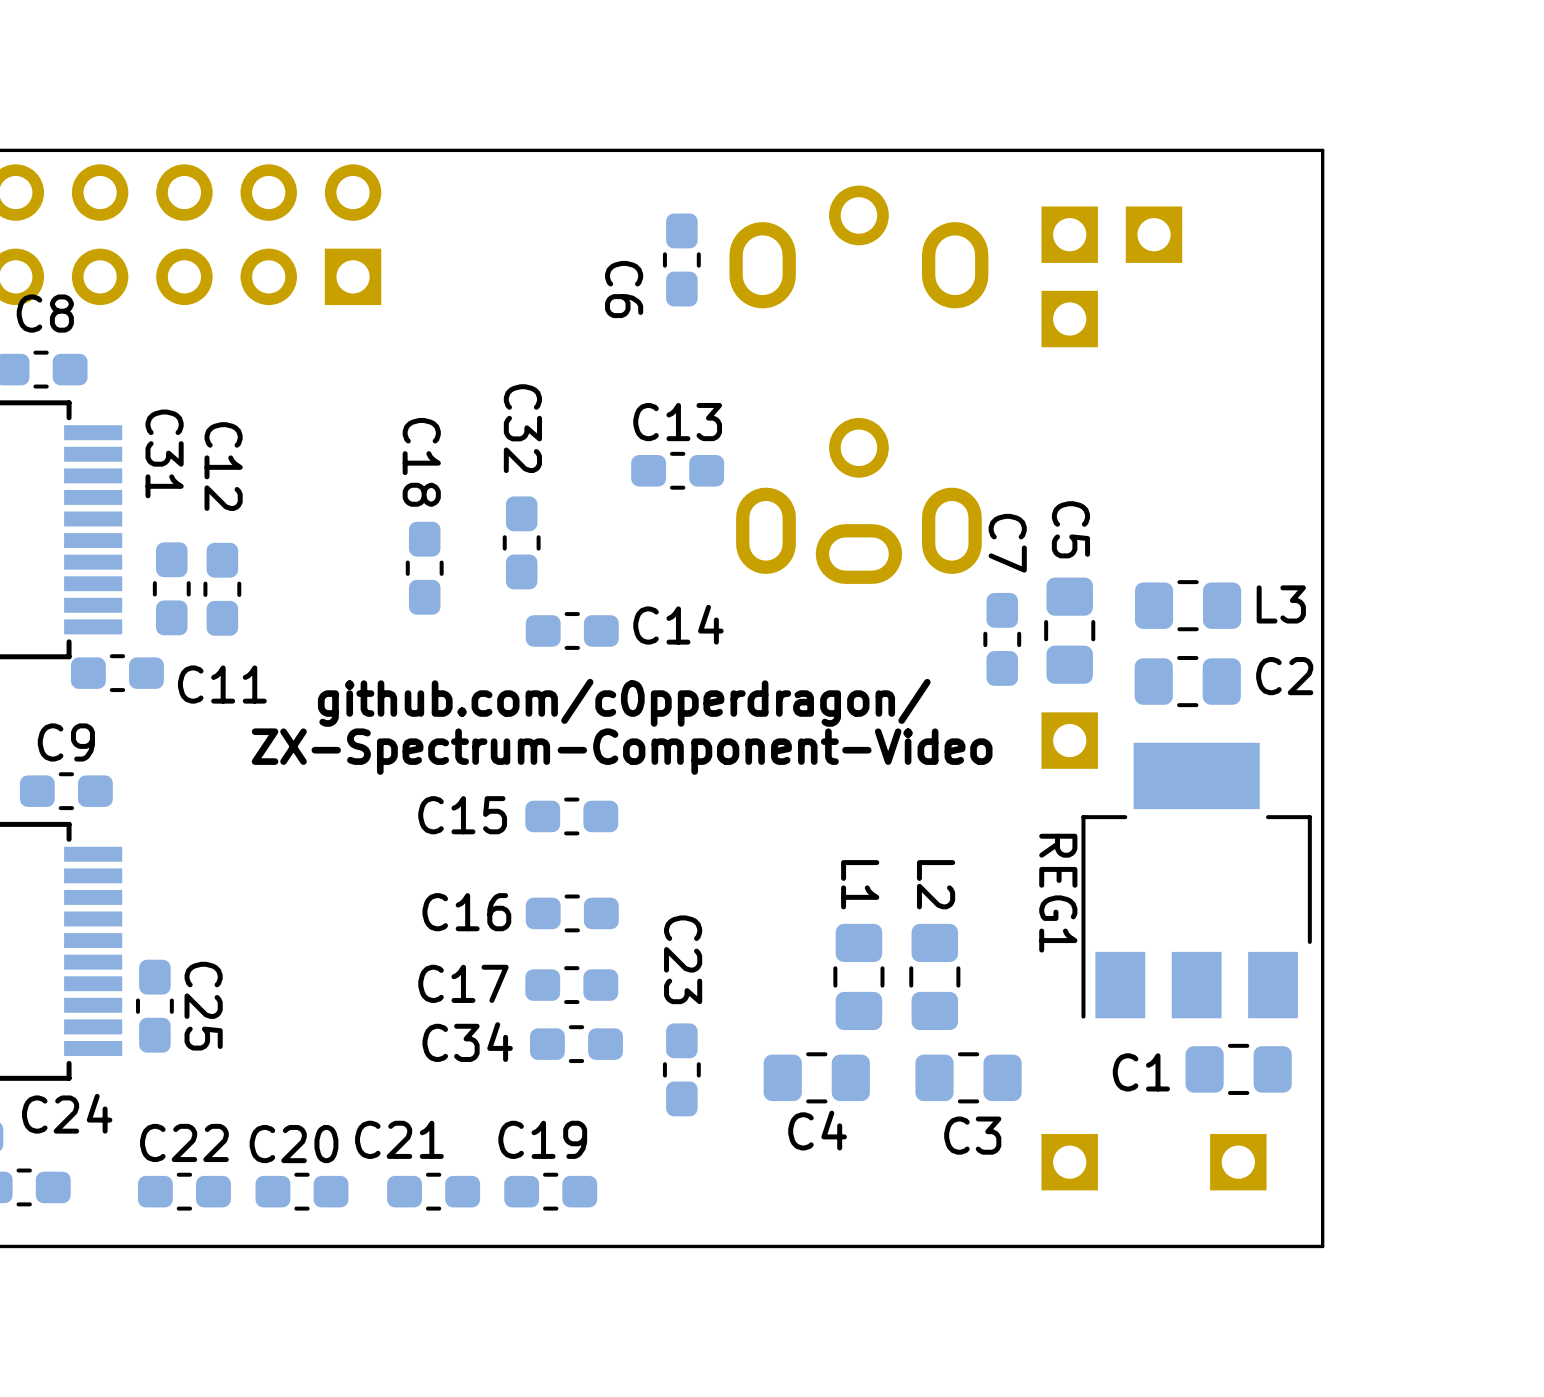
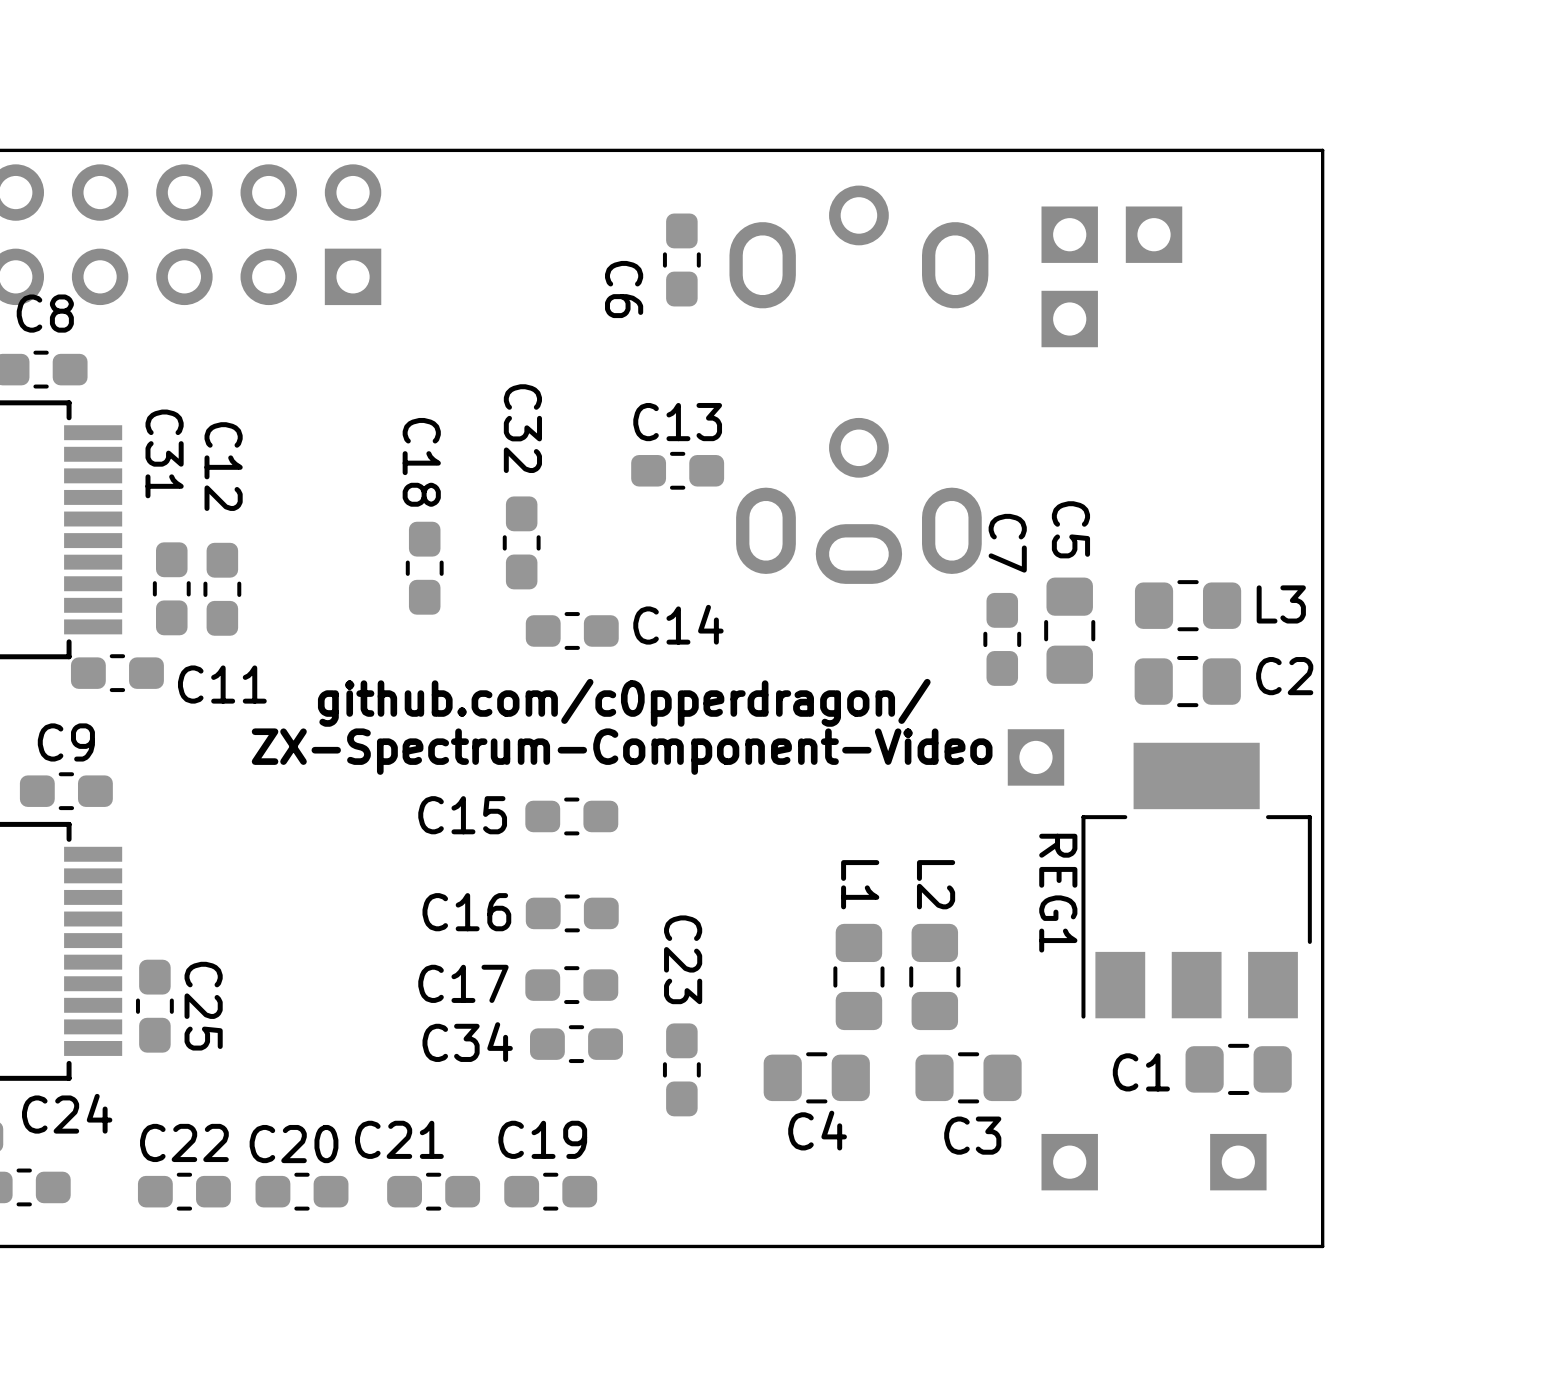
part position: (1069, 740) -> (1035, 757)

